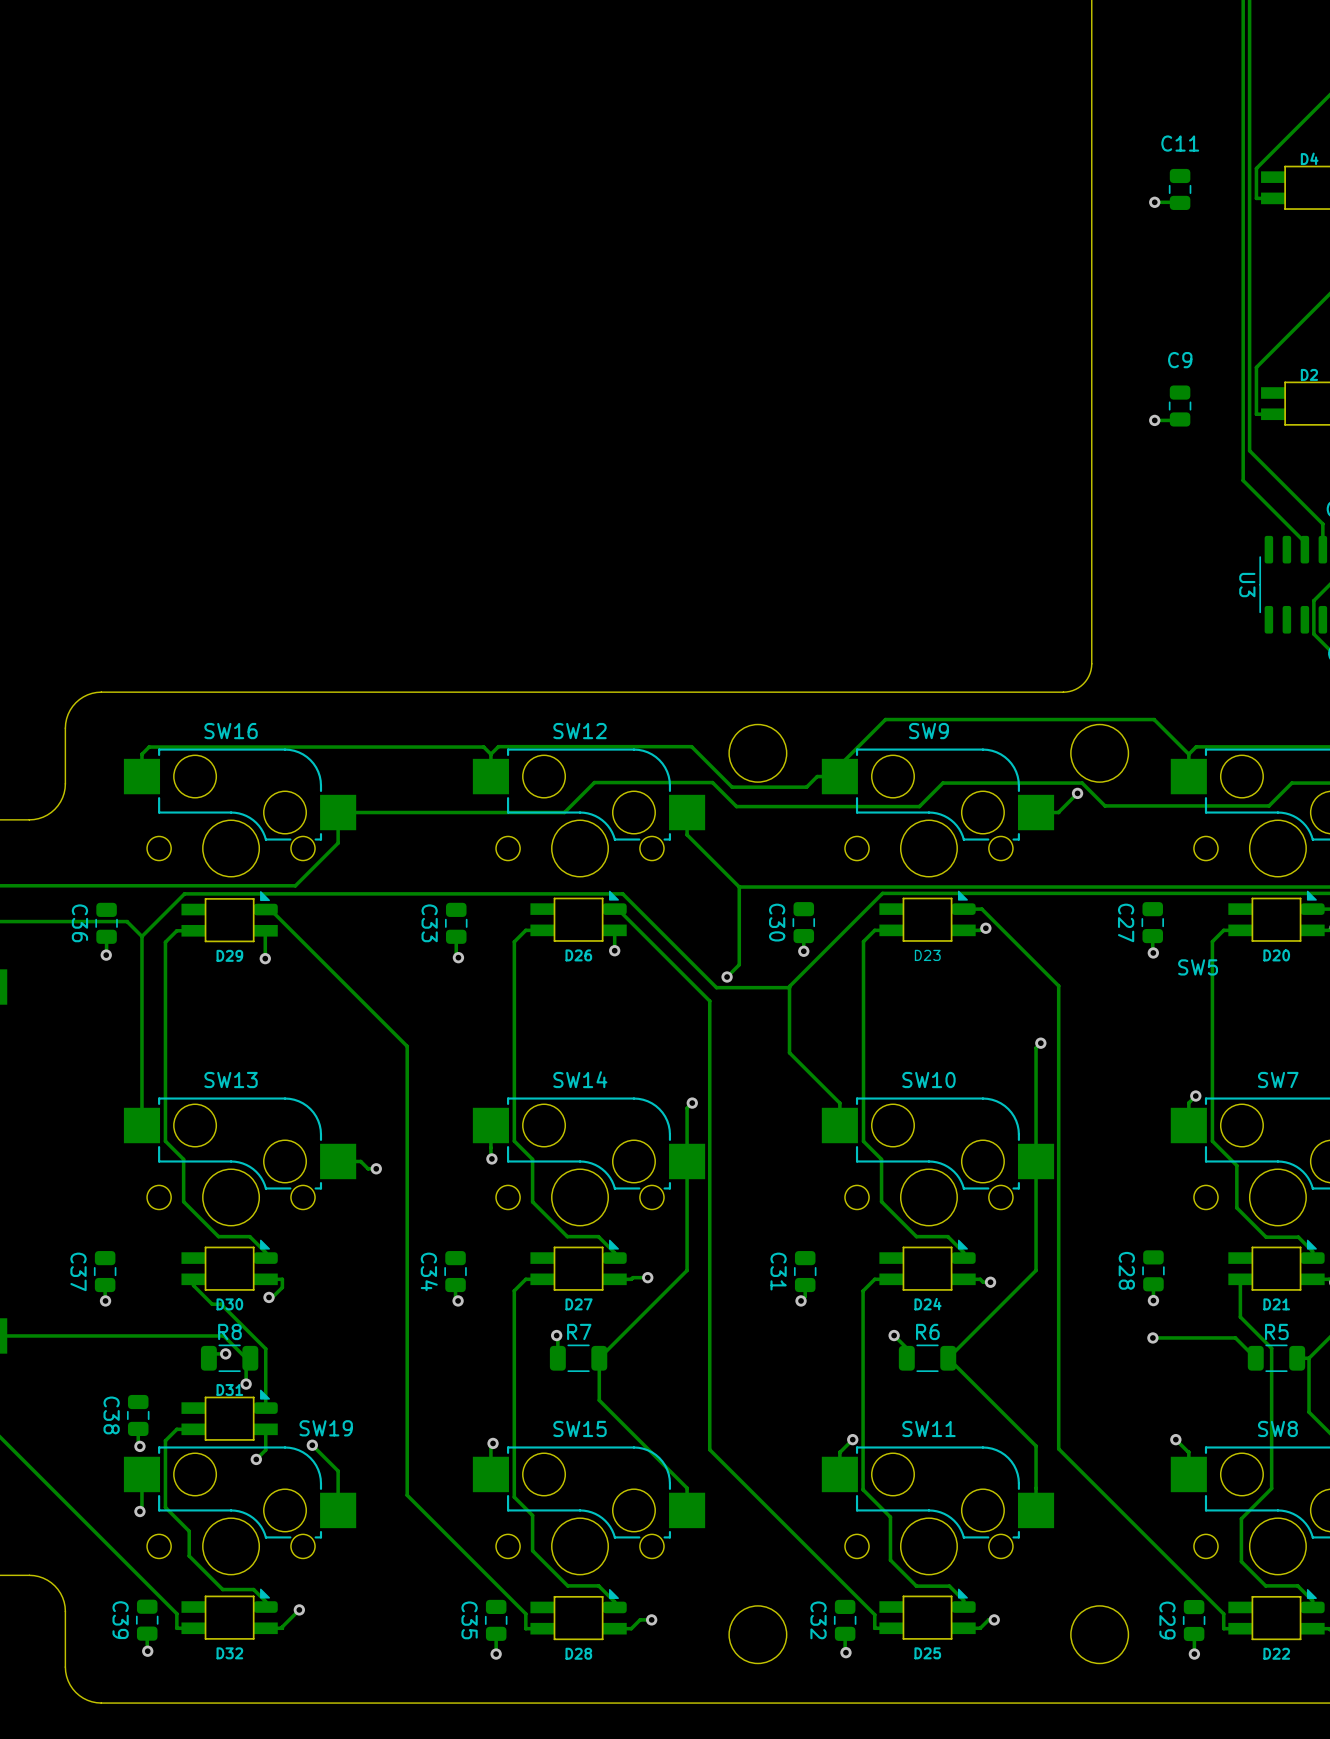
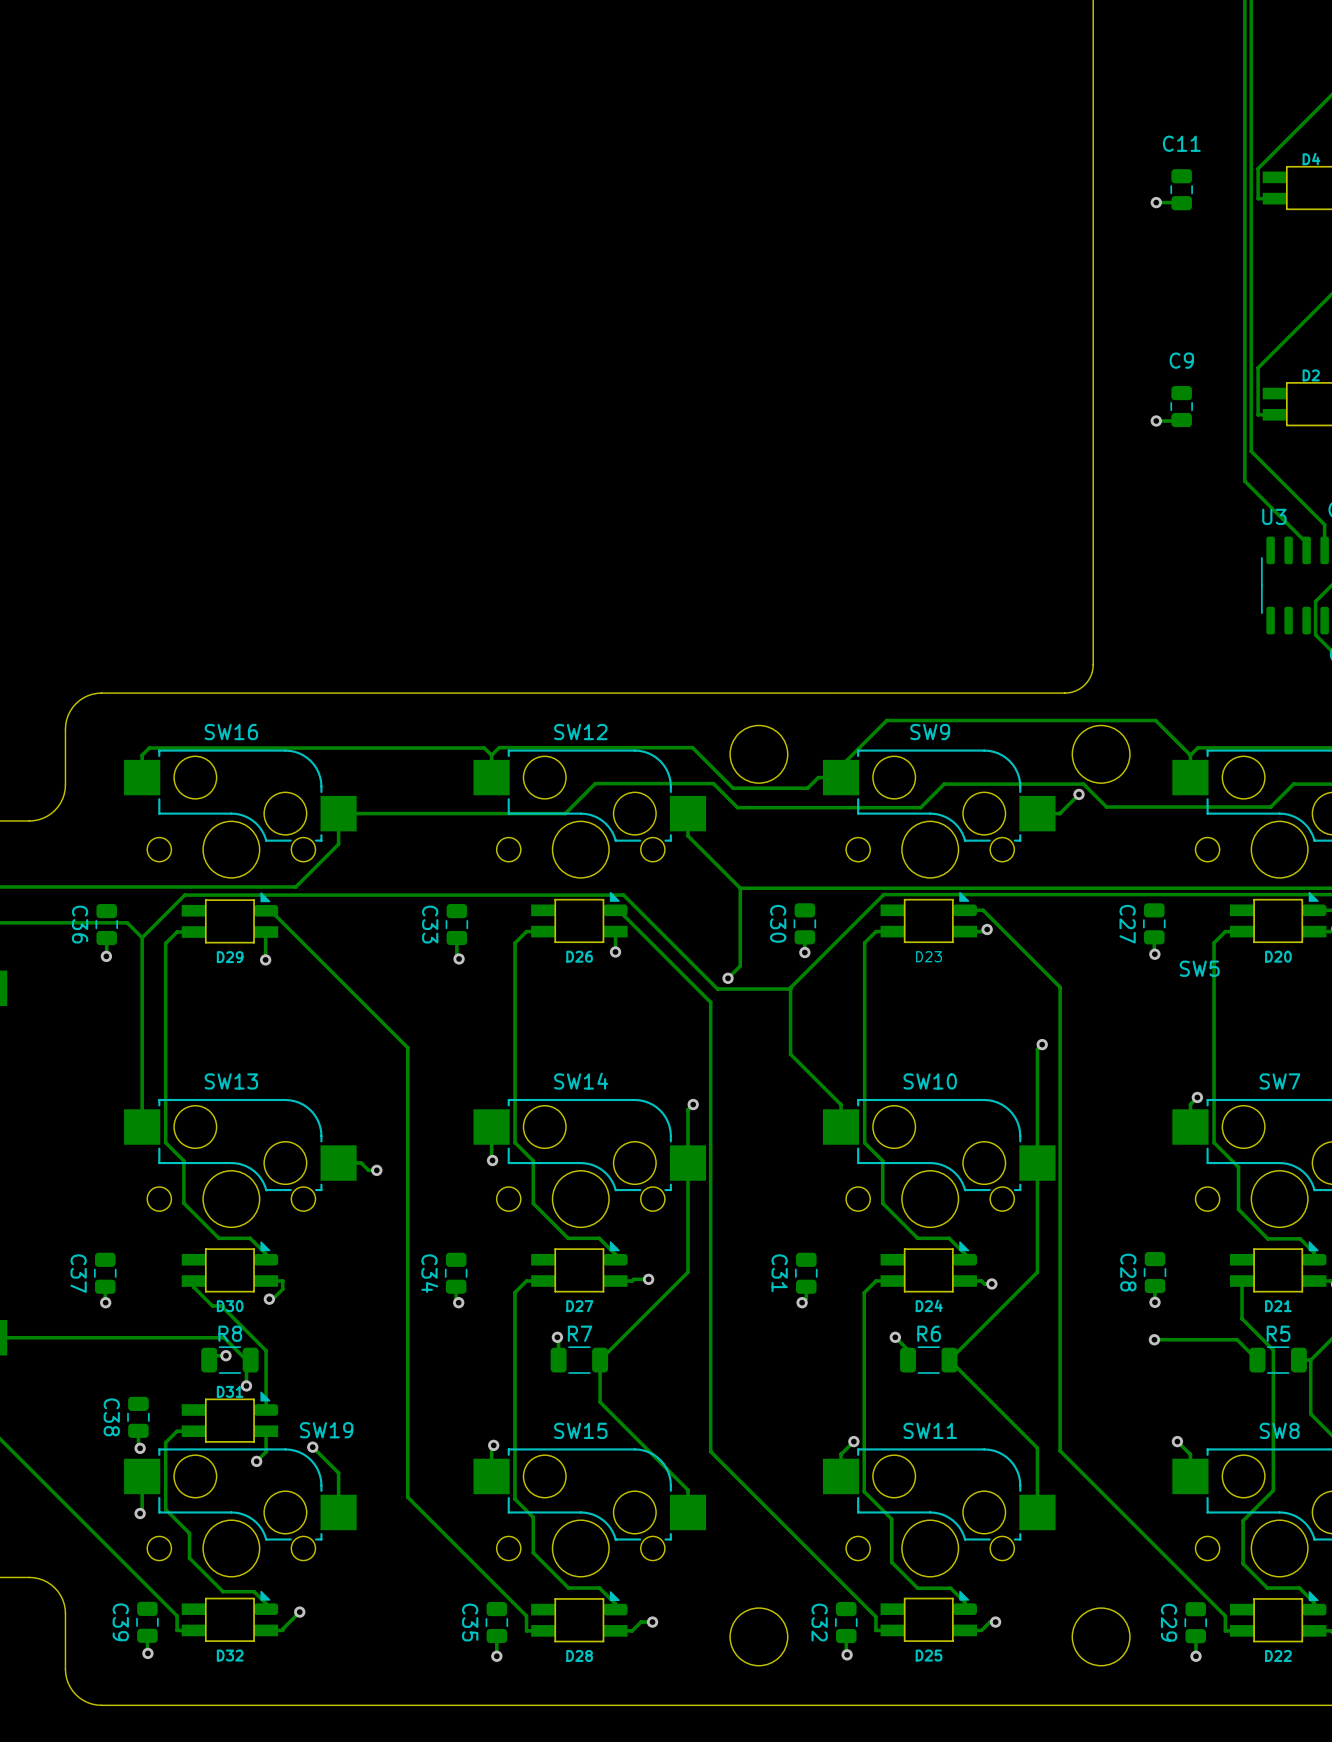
U3 name rotation: 0° (1247, 585) -> 90° counterclockwise (1274, 516)
U3 name position: U3 (1247, 585) -> U3 (1274, 516)

